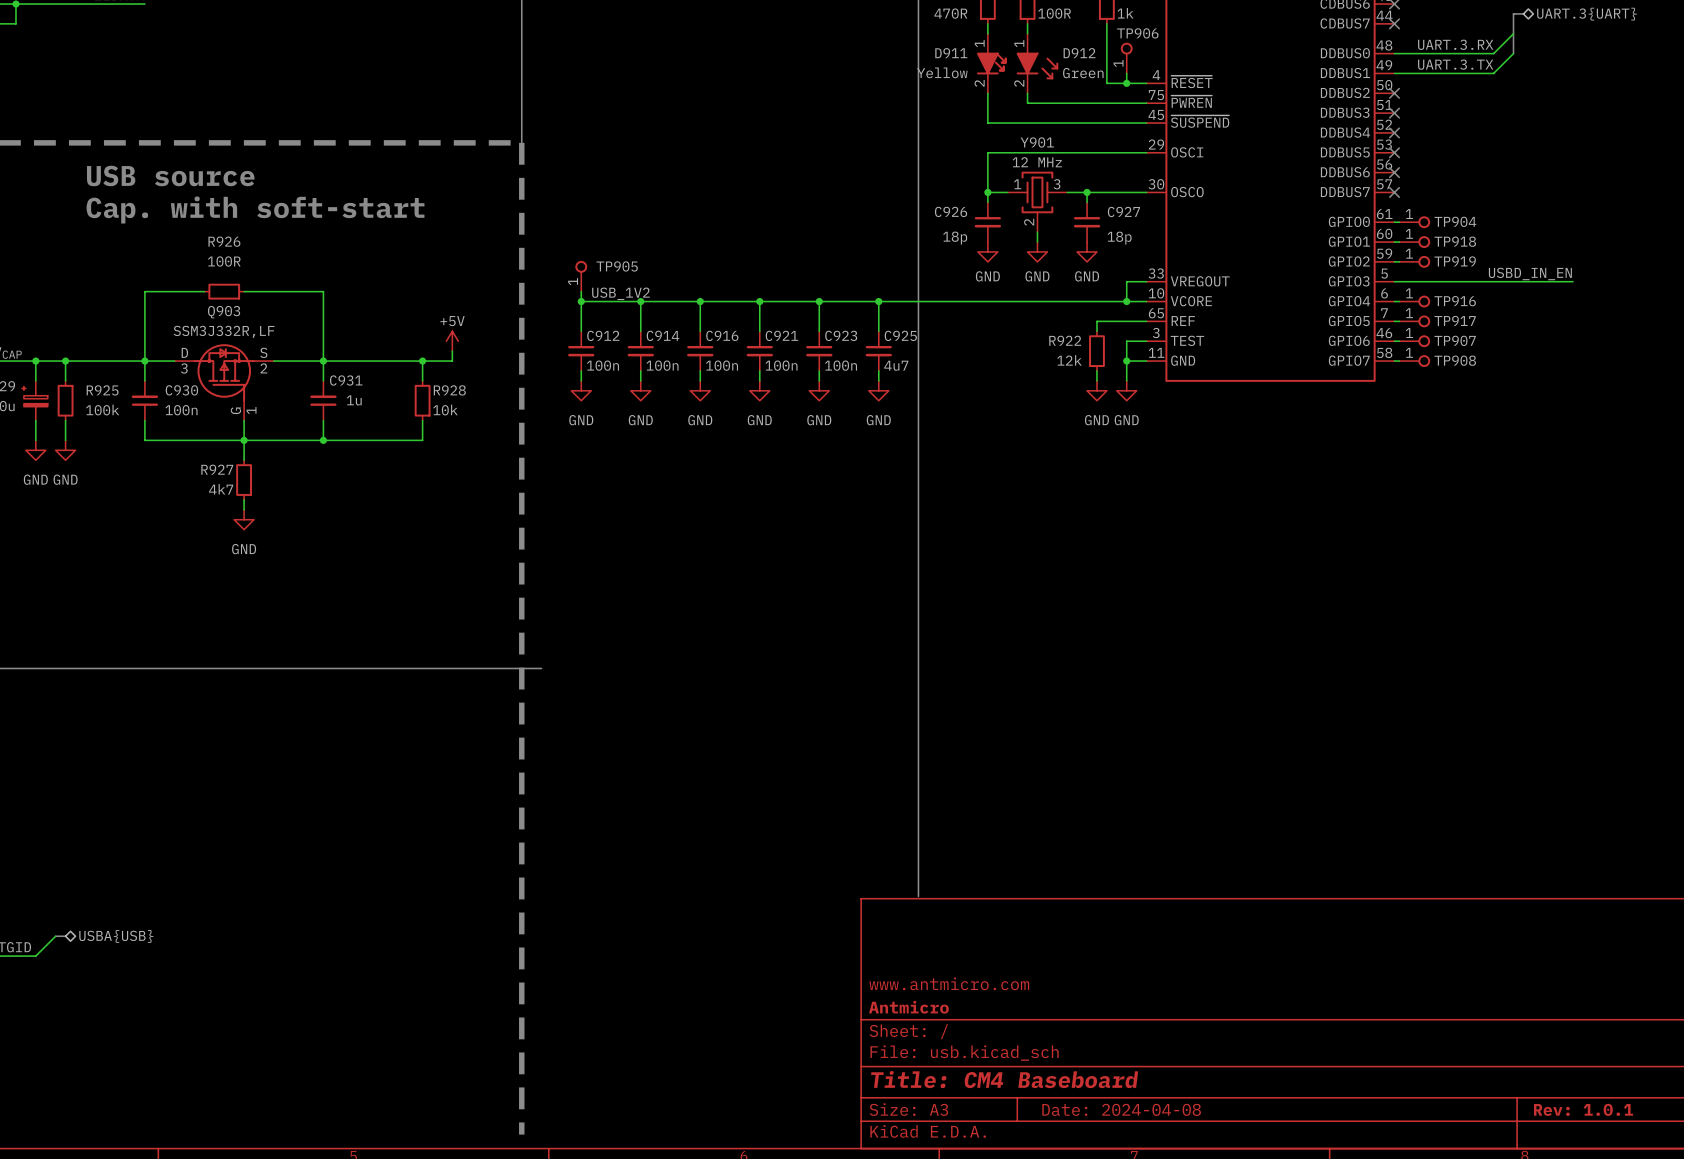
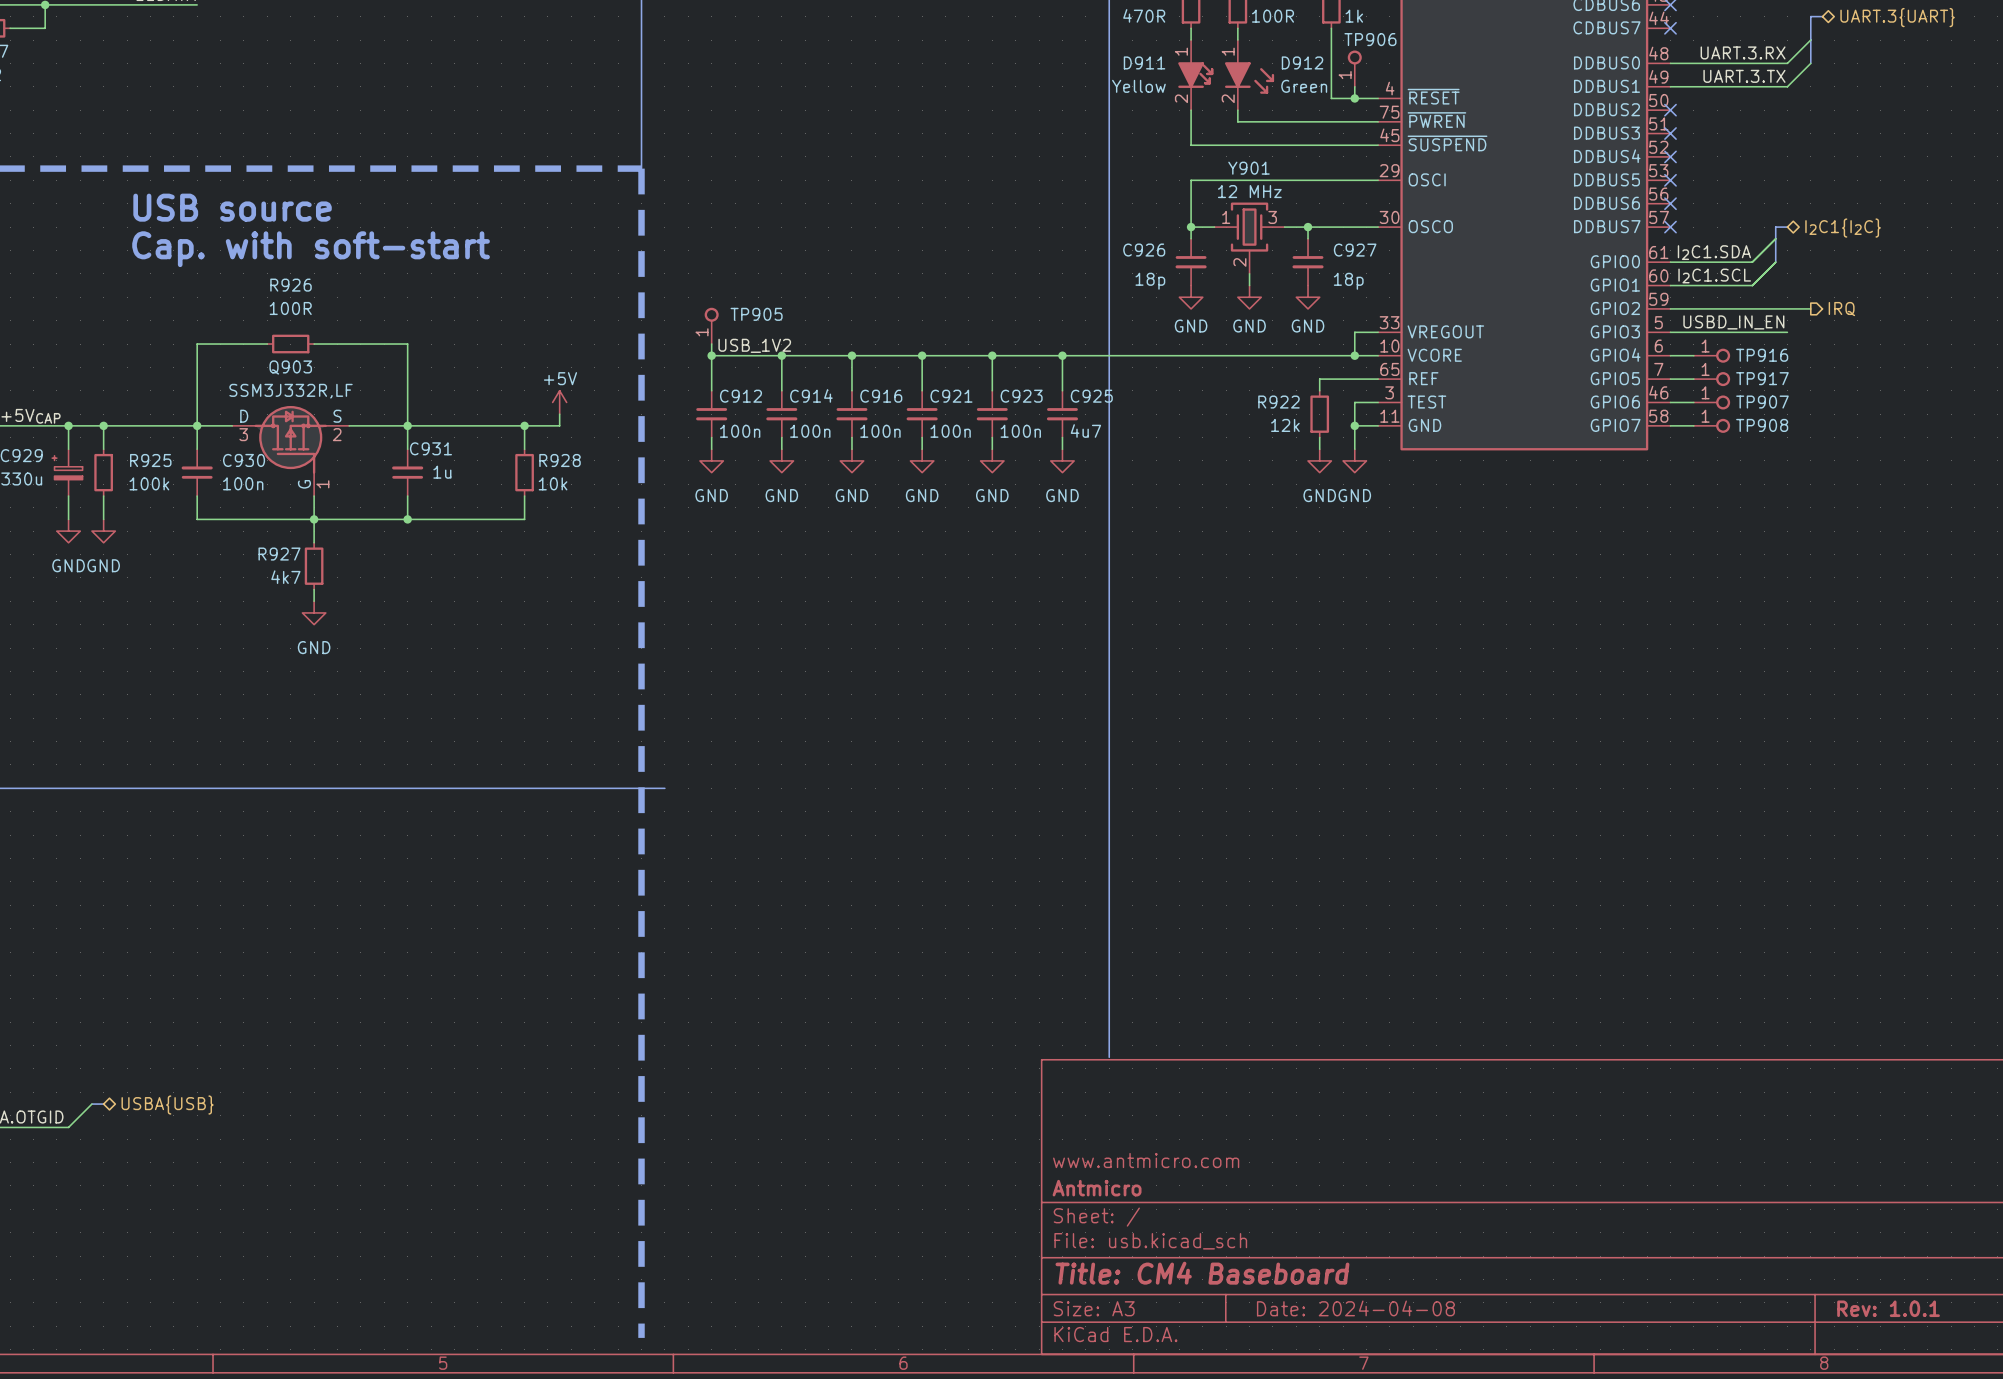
bus: none -> (1787, 227) (1775, 227) (1775, 262)
hierarchical label: none -> I2C1{I2C} (1843, 228)
wire: none -> (1775, 238) (1752, 262) (1676, 262)
label: none -> I2C1.SDA (1714, 252)
TP904: (1414, 222) -> none
wire: none -> (1775, 262) (1752, 285) (1676, 285)
label: none -> I2C1.SCL (1714, 275)
TP918: (1414, 242) -> none
wire: none -> (1676, 308) (1810, 308)
TP919: (1414, 261) -> none
hierarchical label: none -> IRQ (1841, 309)
label position: USBD_IN_EN (1530, 273) -> USBD_IN_EN (1733, 322)
wire: (1493, 281) (1572, 281) -> none
TP916 position: (1414, 301) -> (1712, 355)
TP917 position: (1414, 321) -> (1712, 379)
TP907 position: (1414, 341) -> (1712, 402)
TP908 position: (1414, 361) -> (1712, 425)

